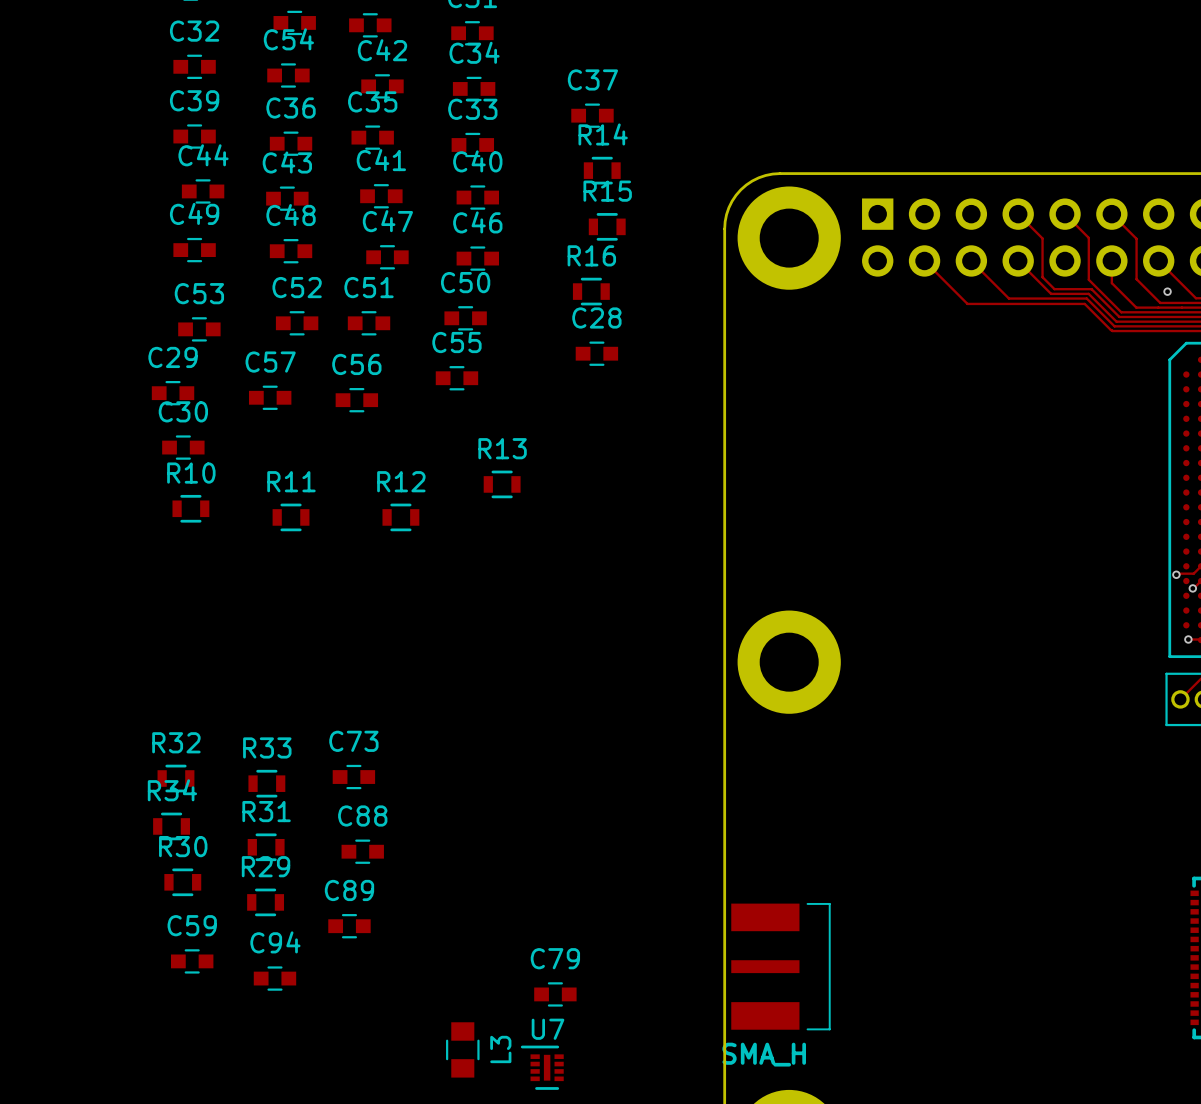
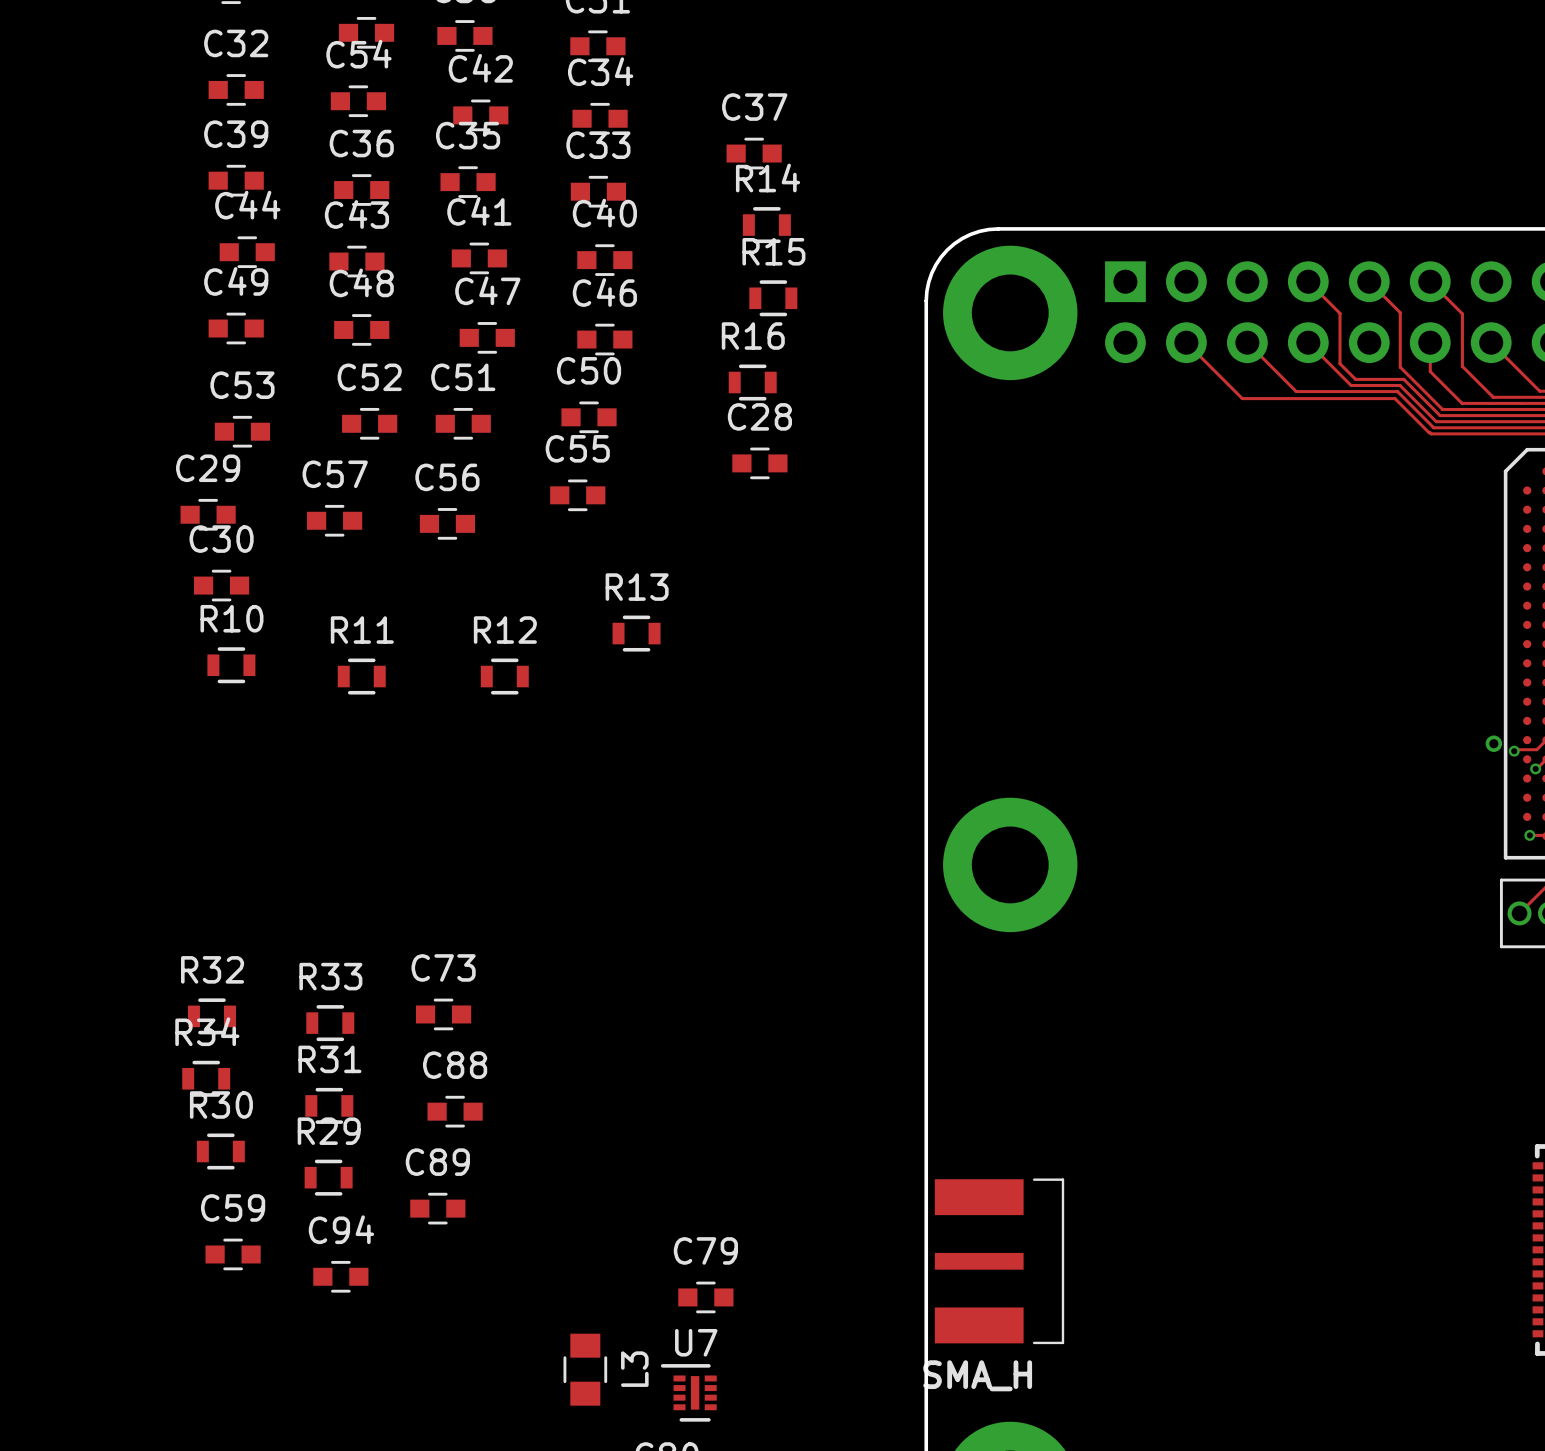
via: (1167, 291) -> none
via: none -> (1493, 743)

